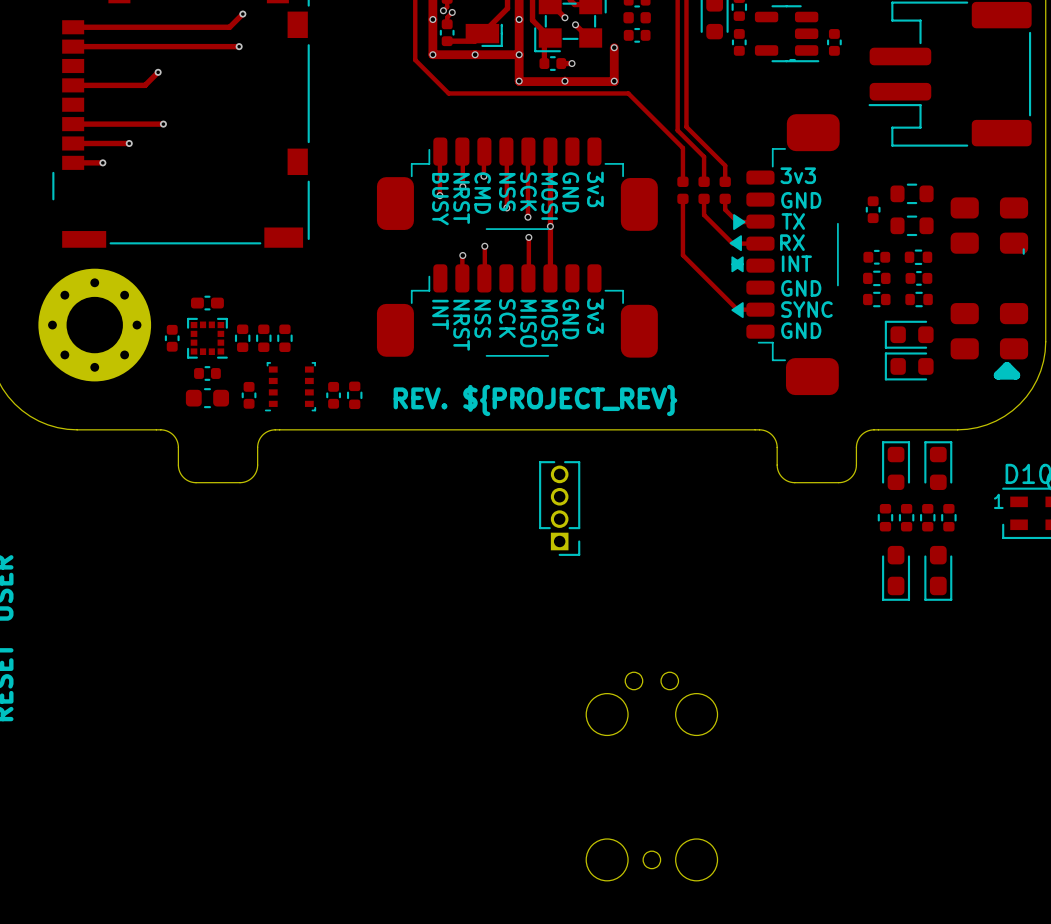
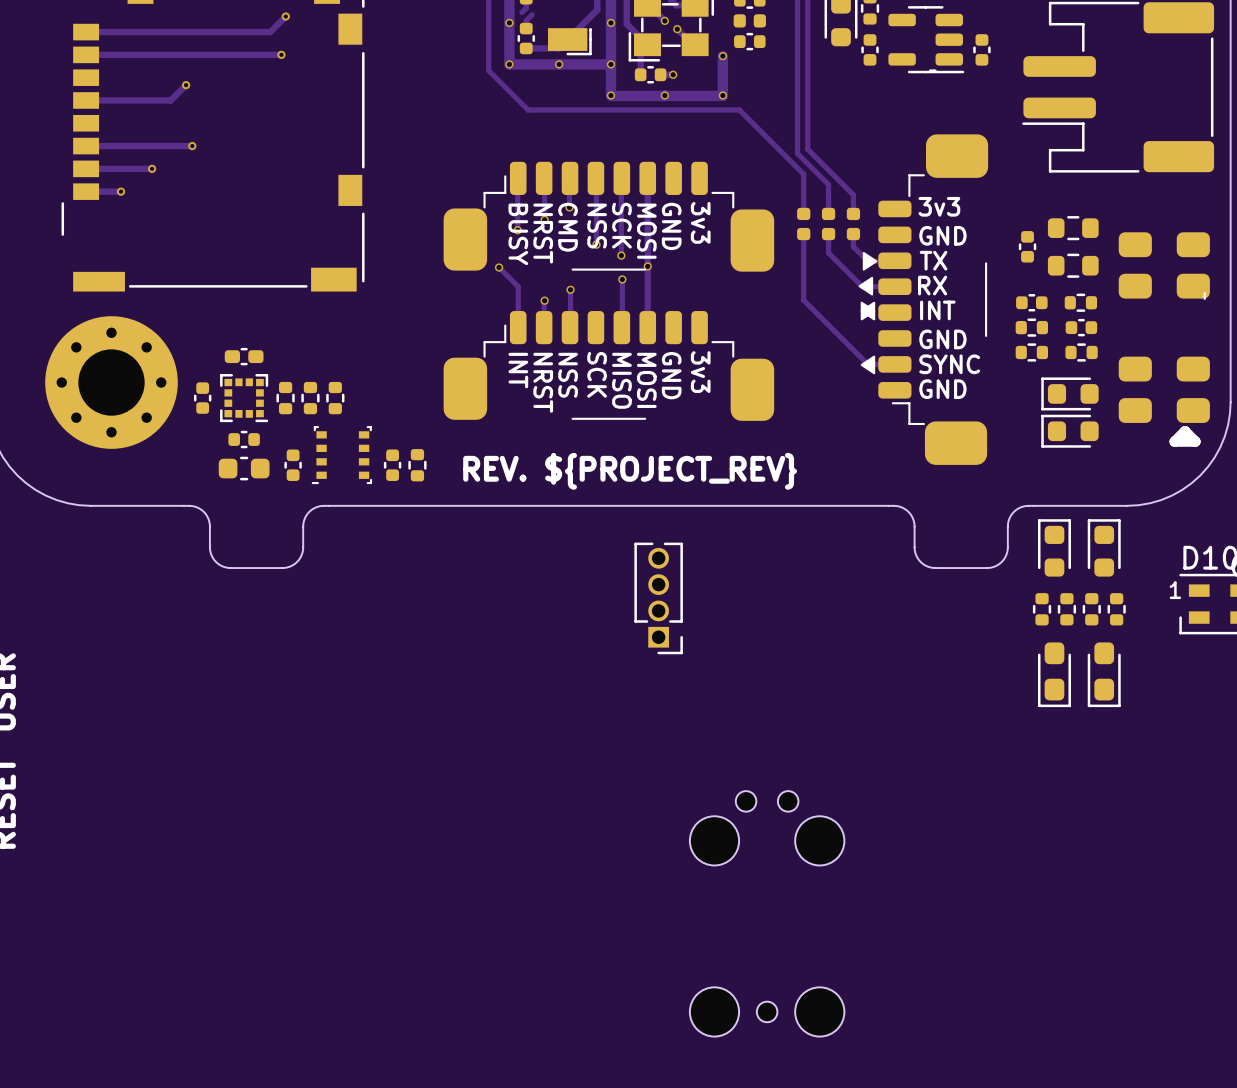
via: (443, 10) -> none
via: (452, 12) -> none
track: none -> (499, 267) (518, 286) (518, 327)
via: none -> (499, 267)

